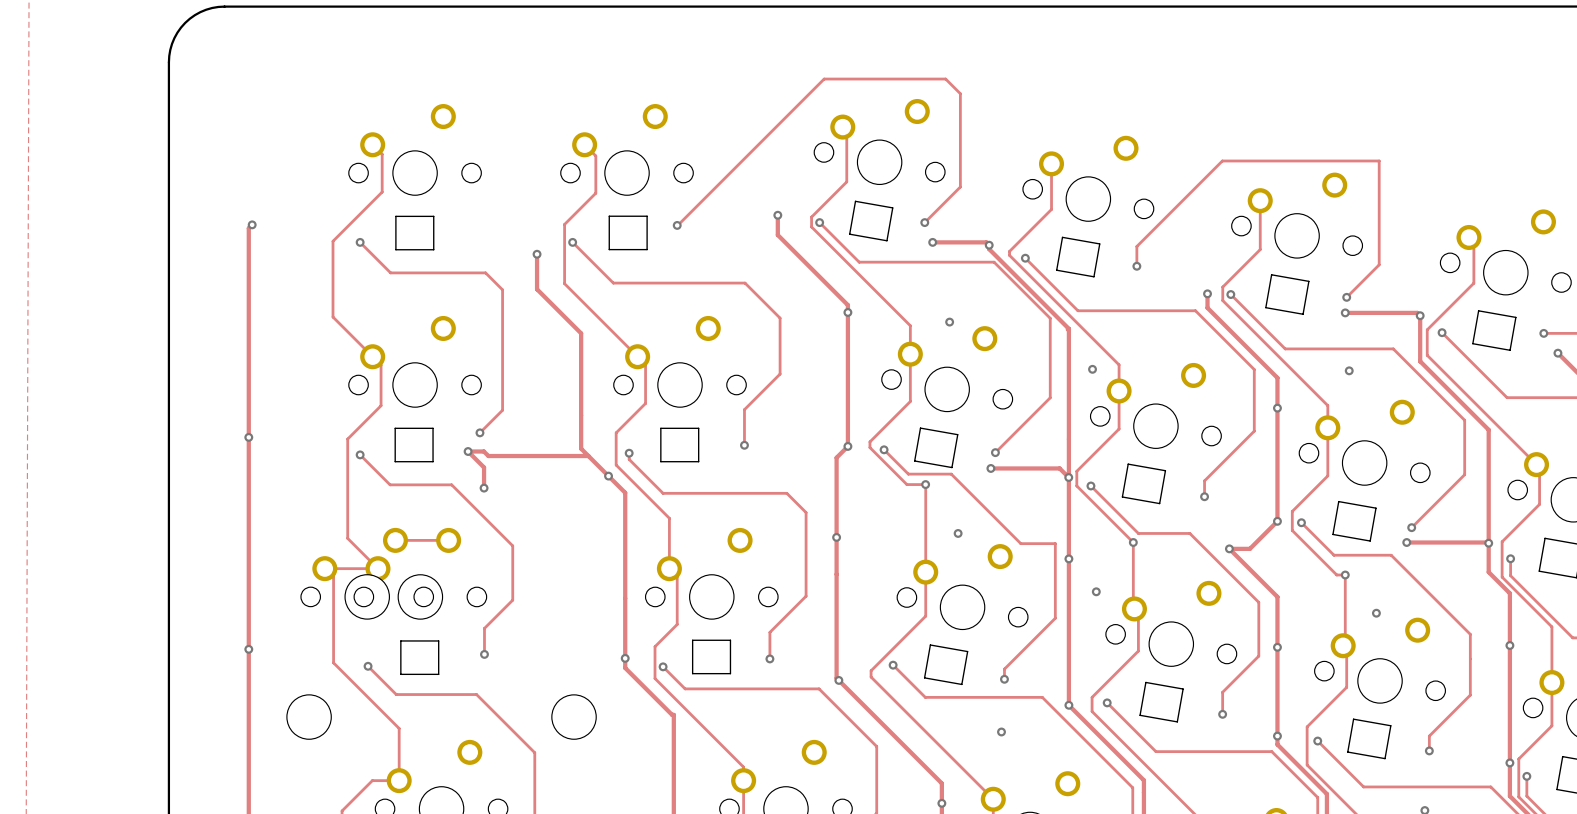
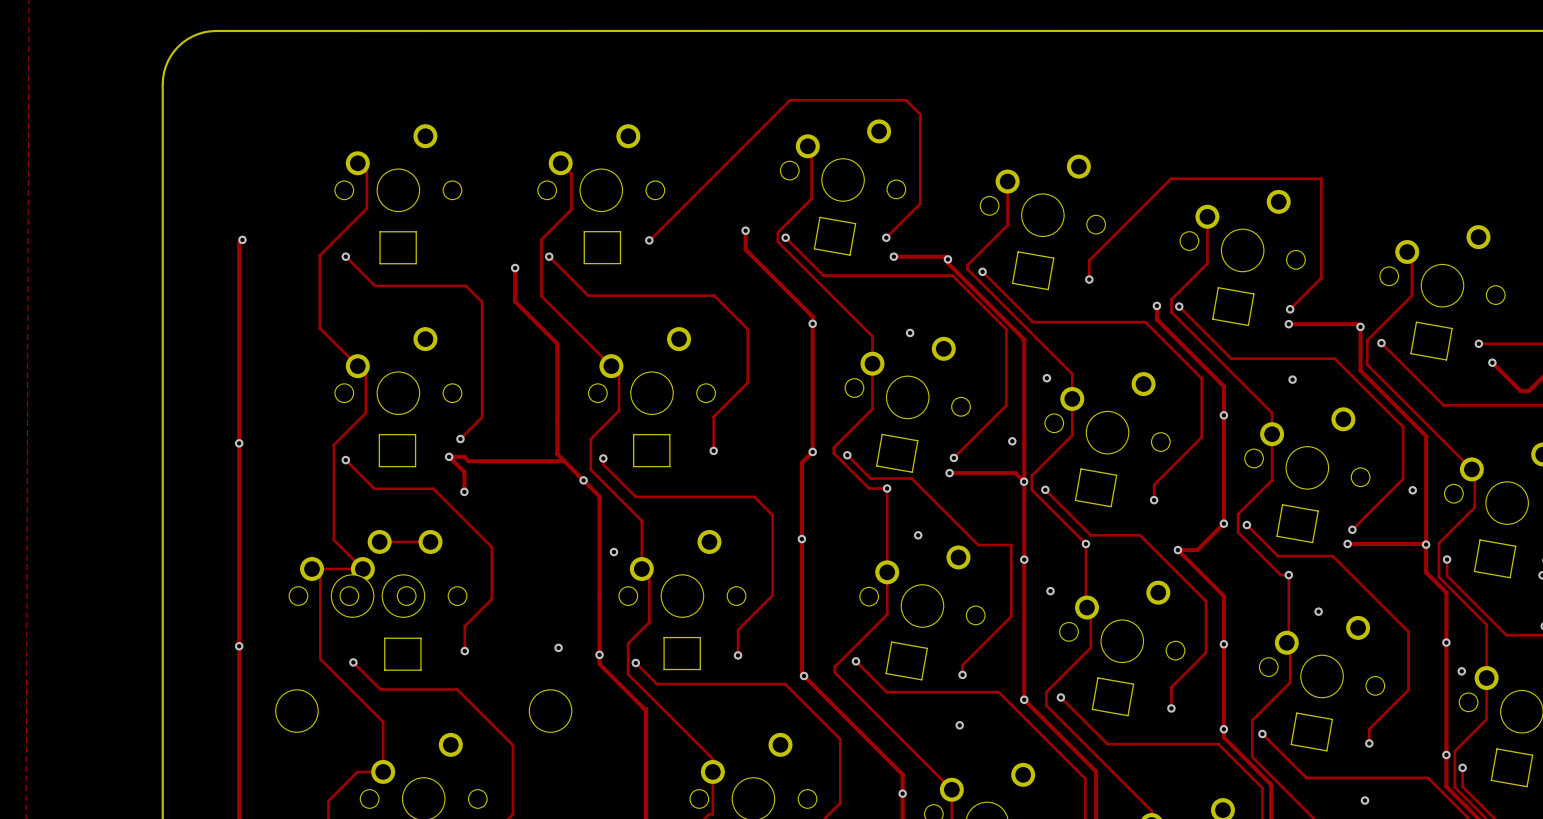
via: none -> (1012, 441)
via: none -> (1412, 490)
via: none -> (613, 552)
via: none -> (558, 647)
via: none -> (1461, 671)

